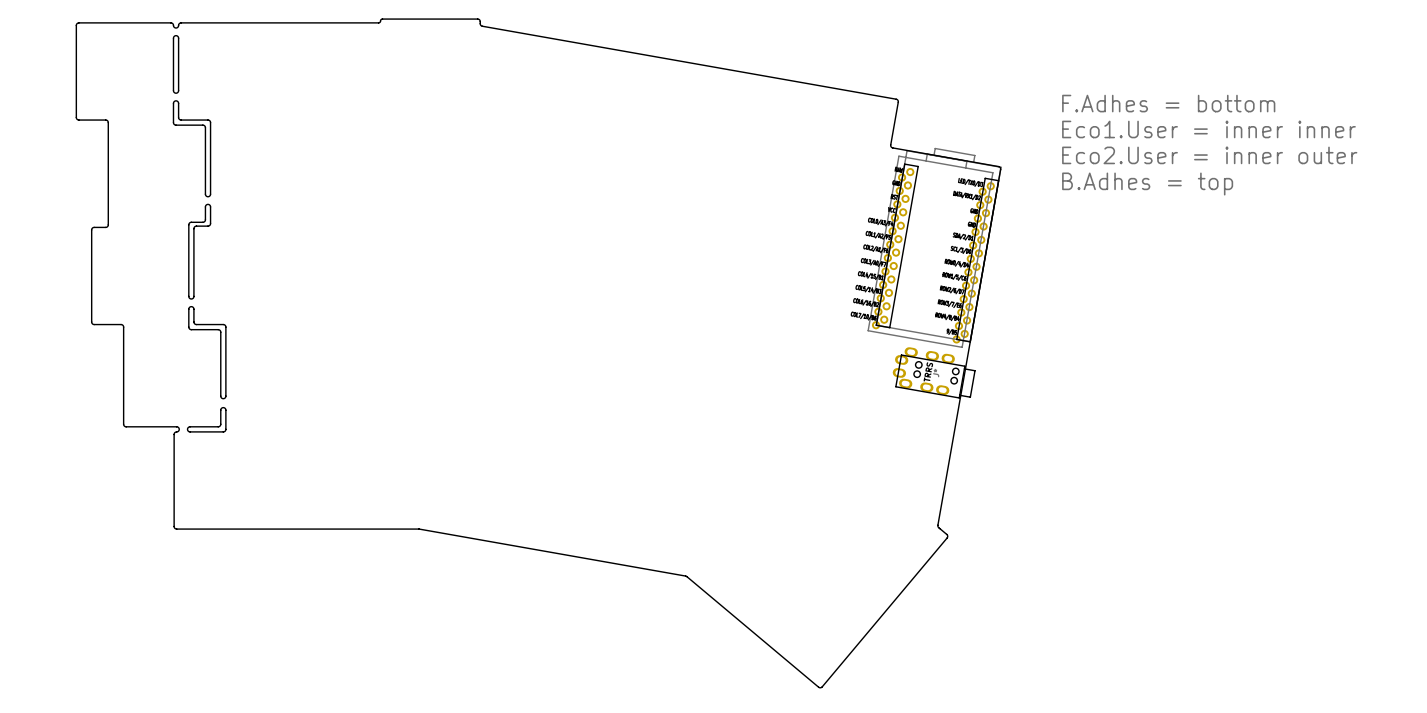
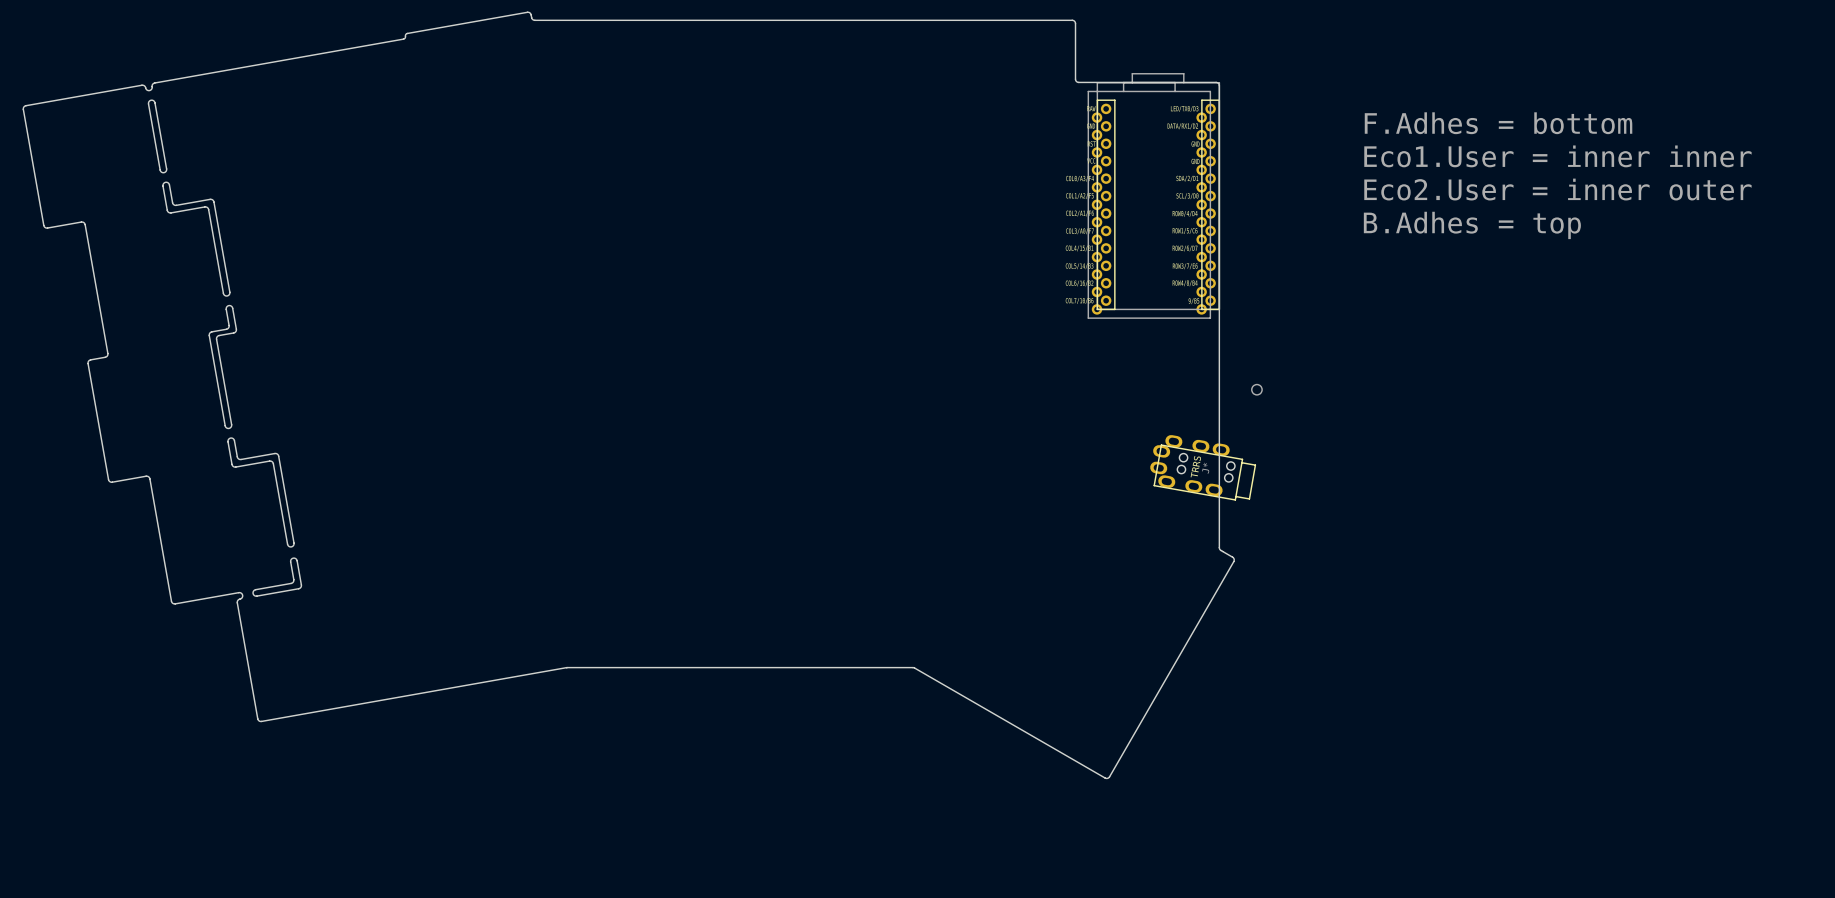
drawing: none -> [23, 12, 1235, 779]
drawing: [76, 18, 1001, 688] -> none
part: none -> (1153, 195)
part: (934, 247) -> none
drawing: none -> [1251, 384, 1263, 396]

